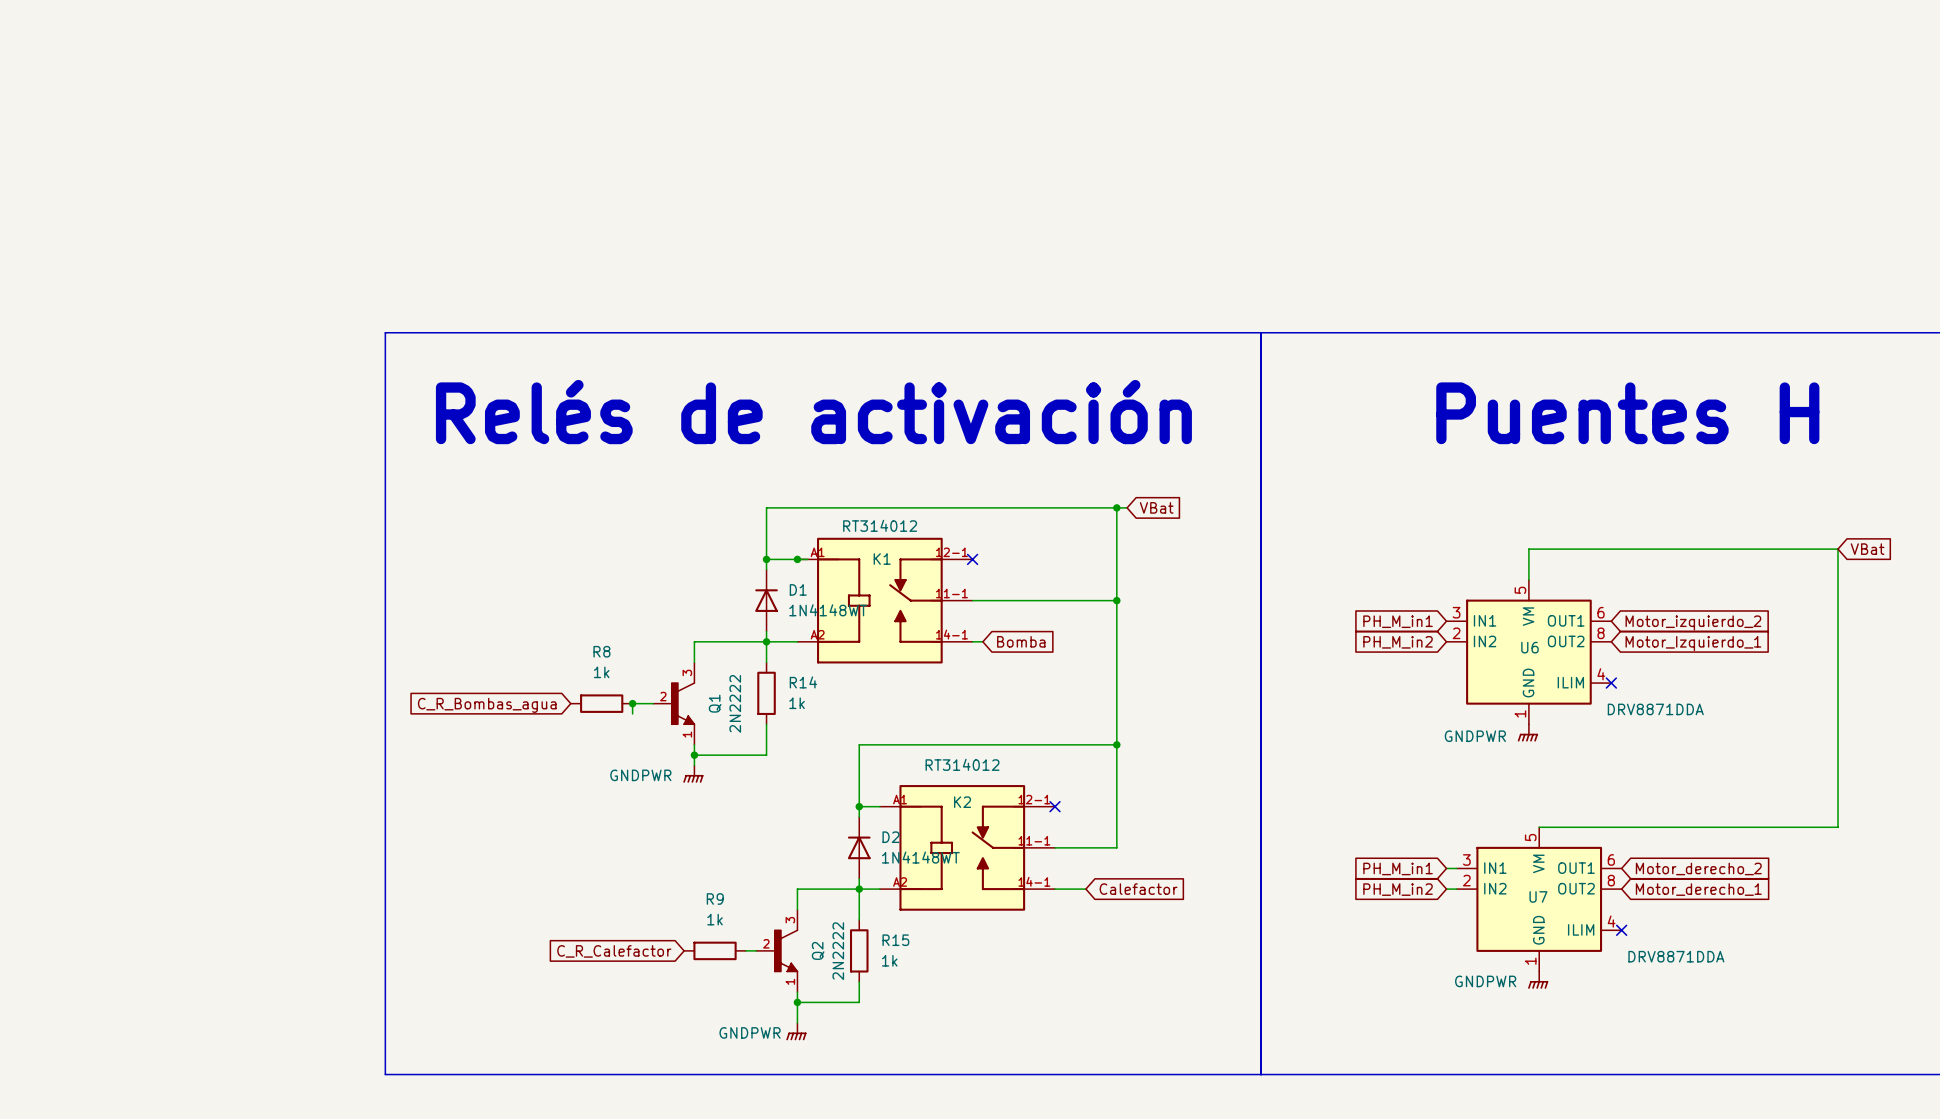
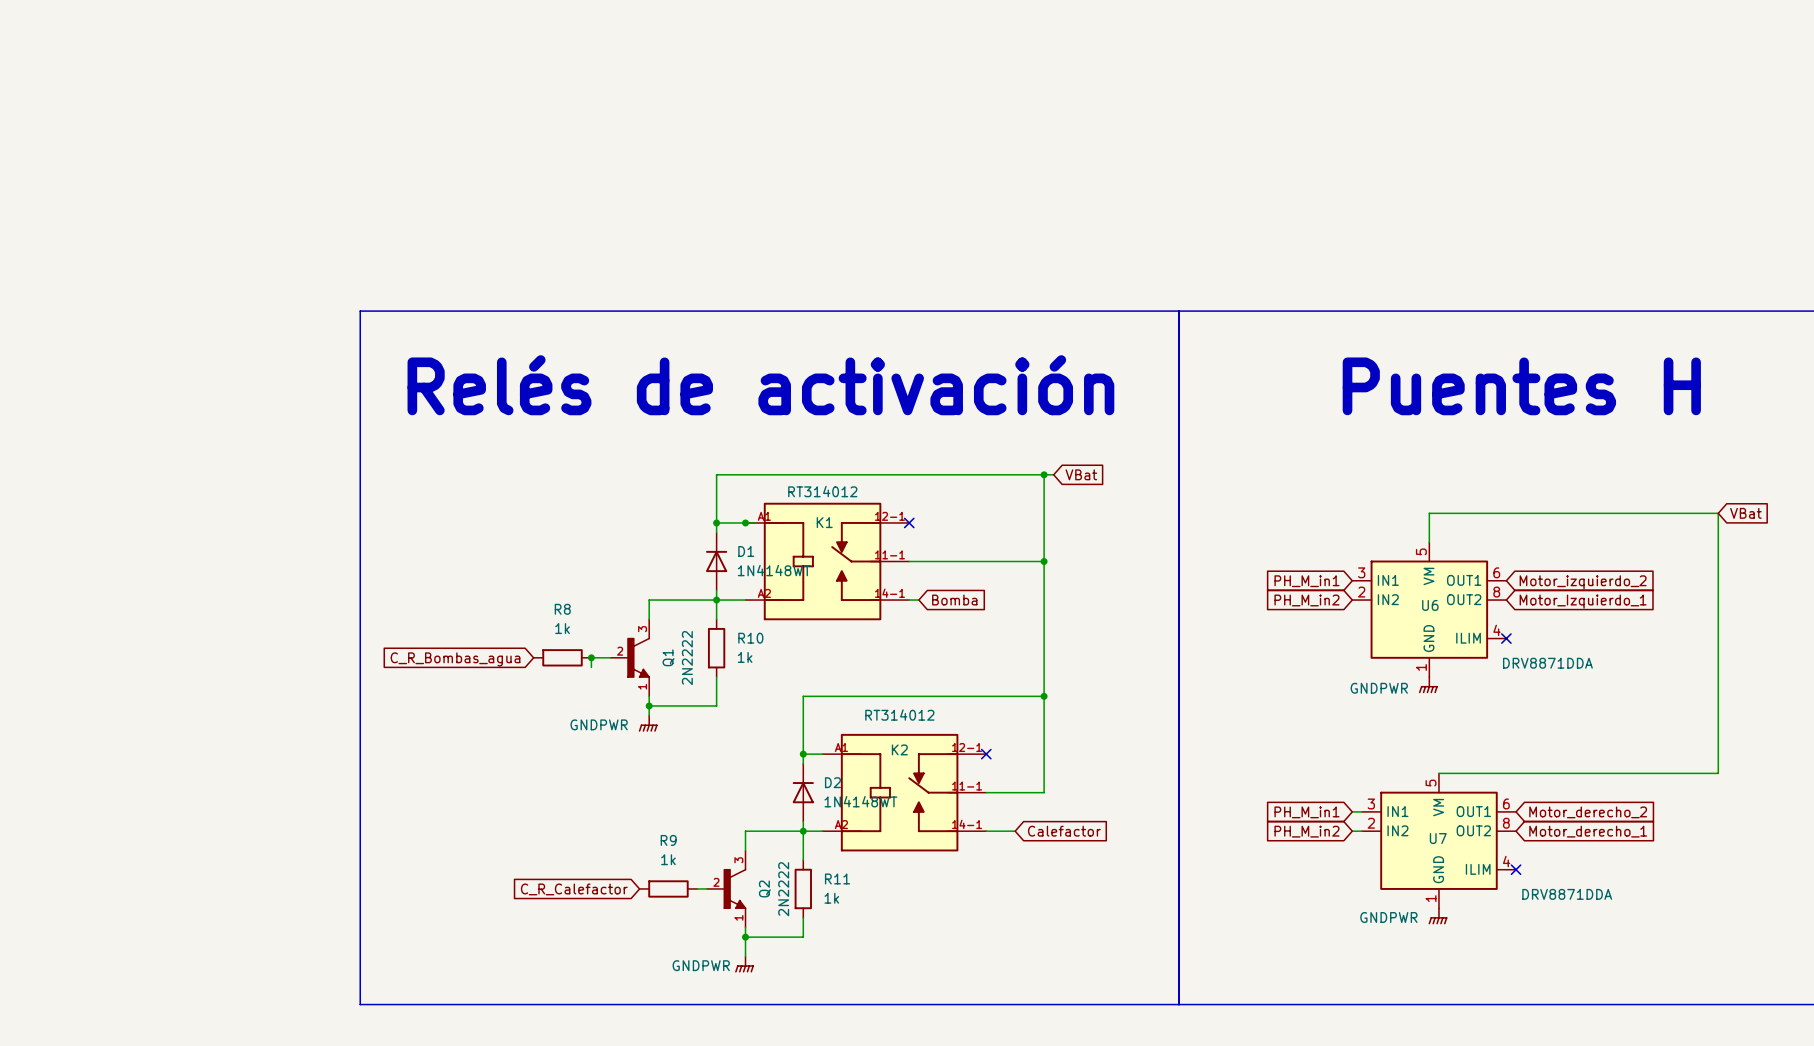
R14 name: R14 (803, 682) -> R10 (750, 638)
R15 name: R15 (895, 940) -> R11 (837, 878)

